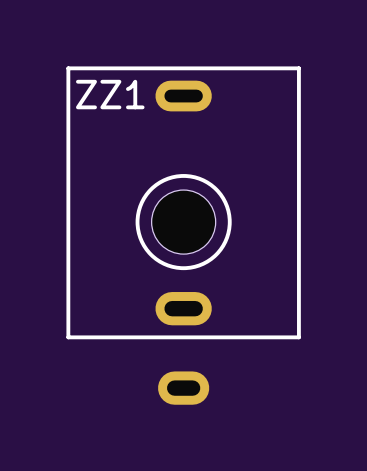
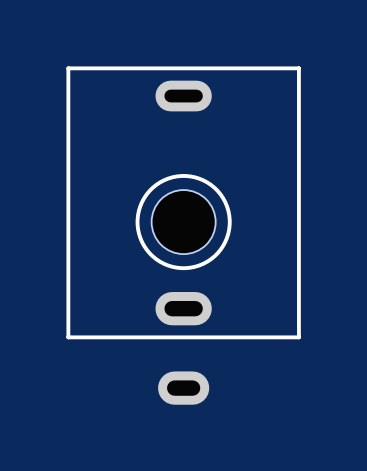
ZZ1 name: ZZ1 (110, 94) -> none

